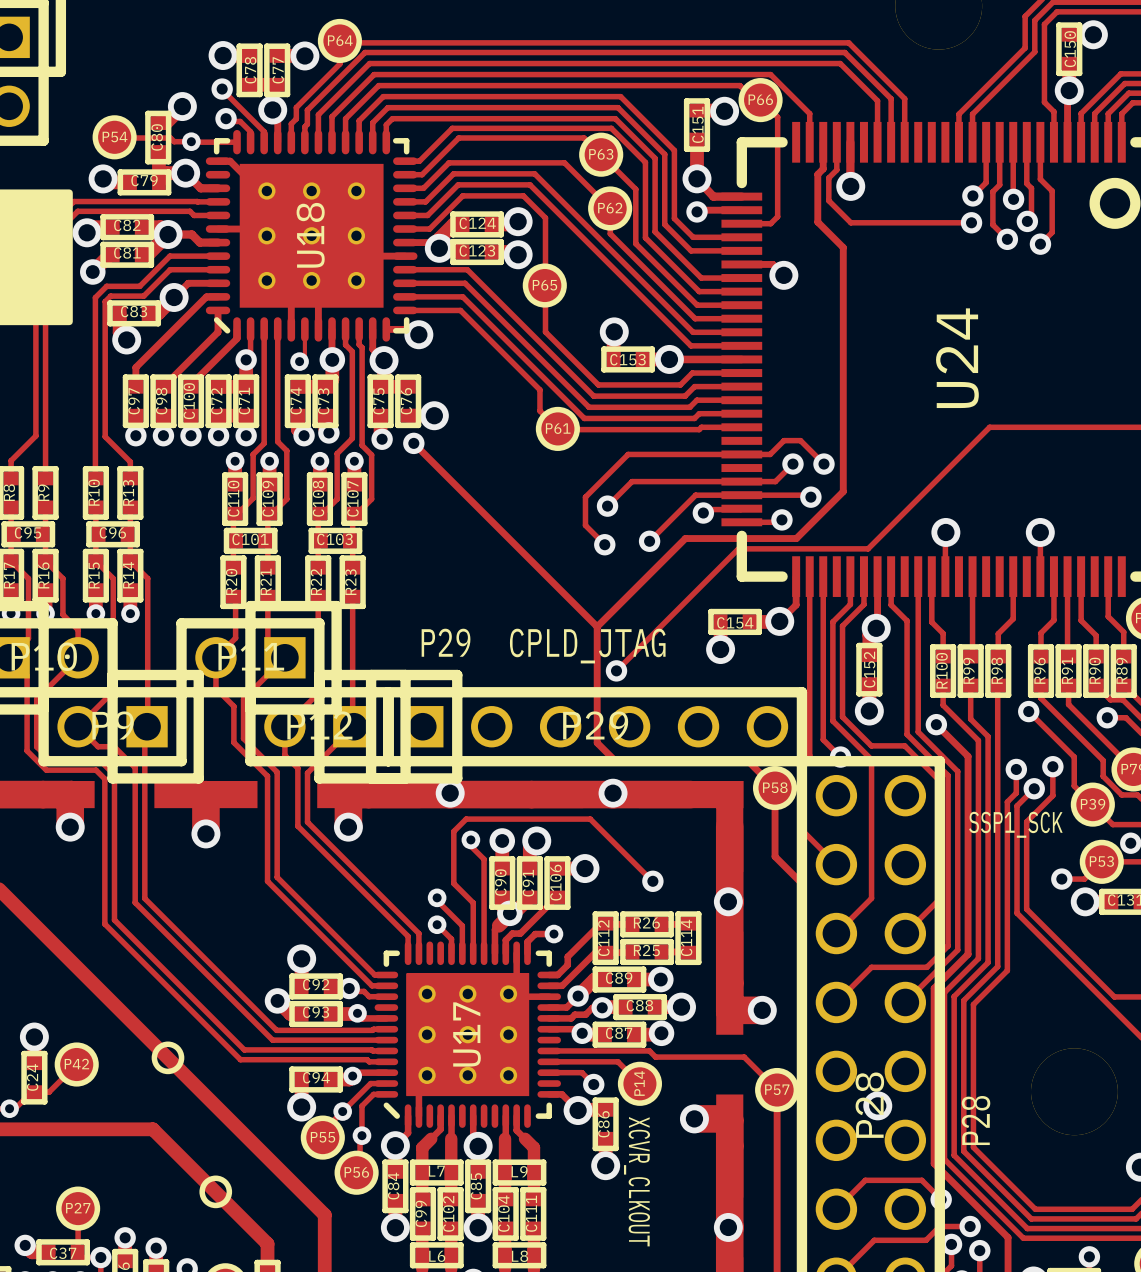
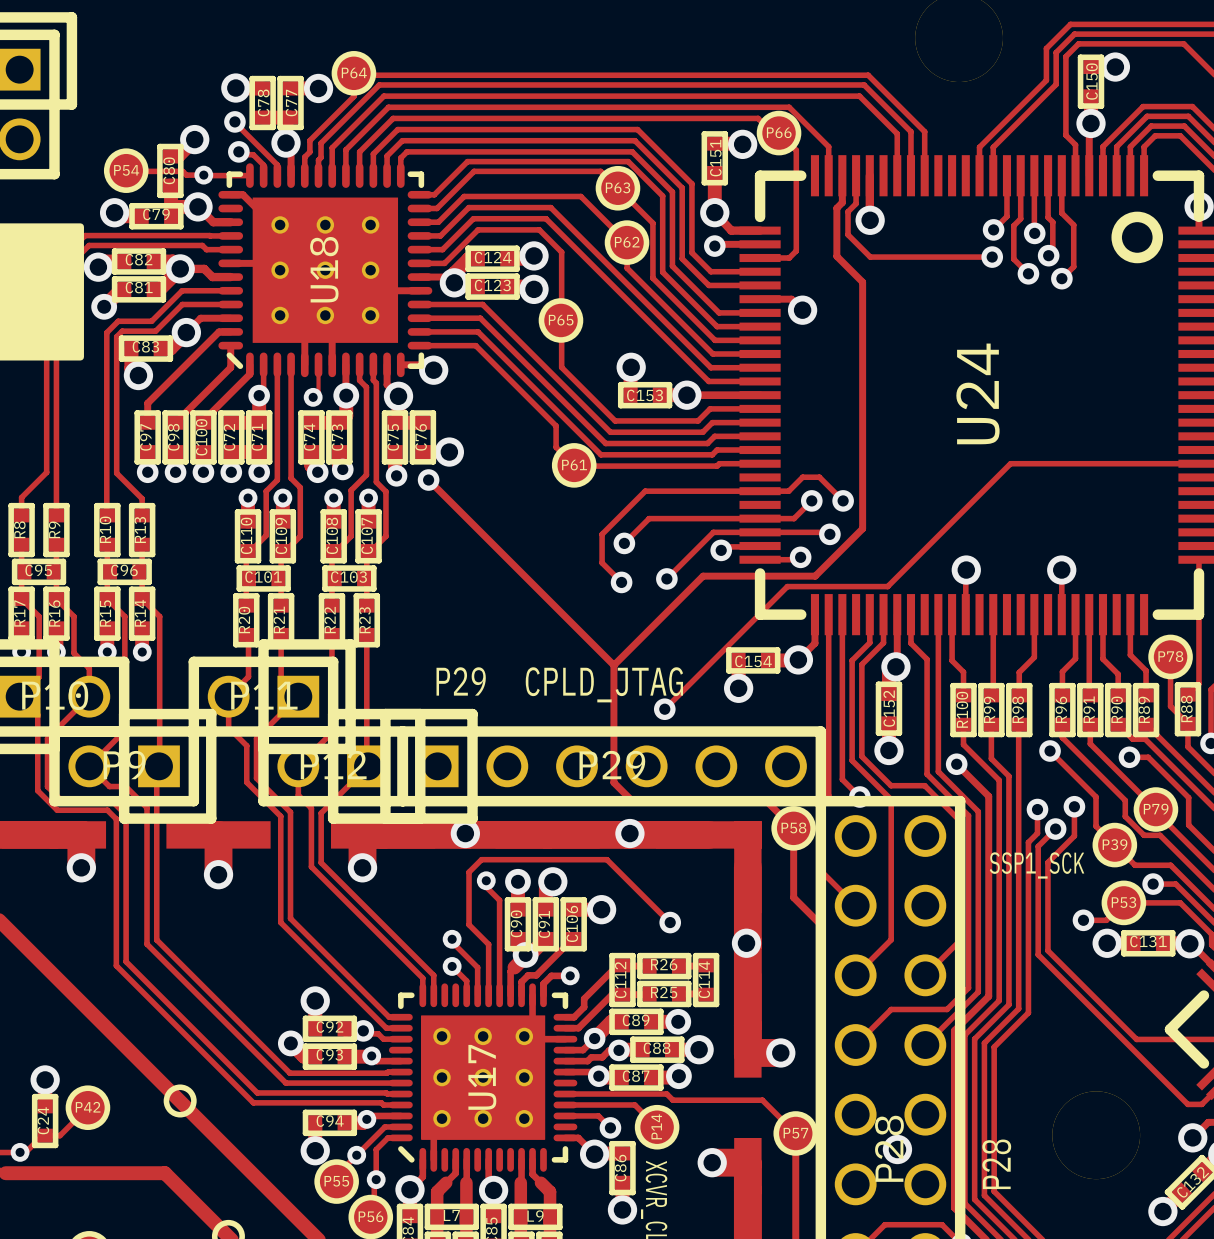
track: (768, 548) (738, 548) (616, 670) -> (787, 586) (664, 709)
via position: (616, 670) -> (664, 709)

